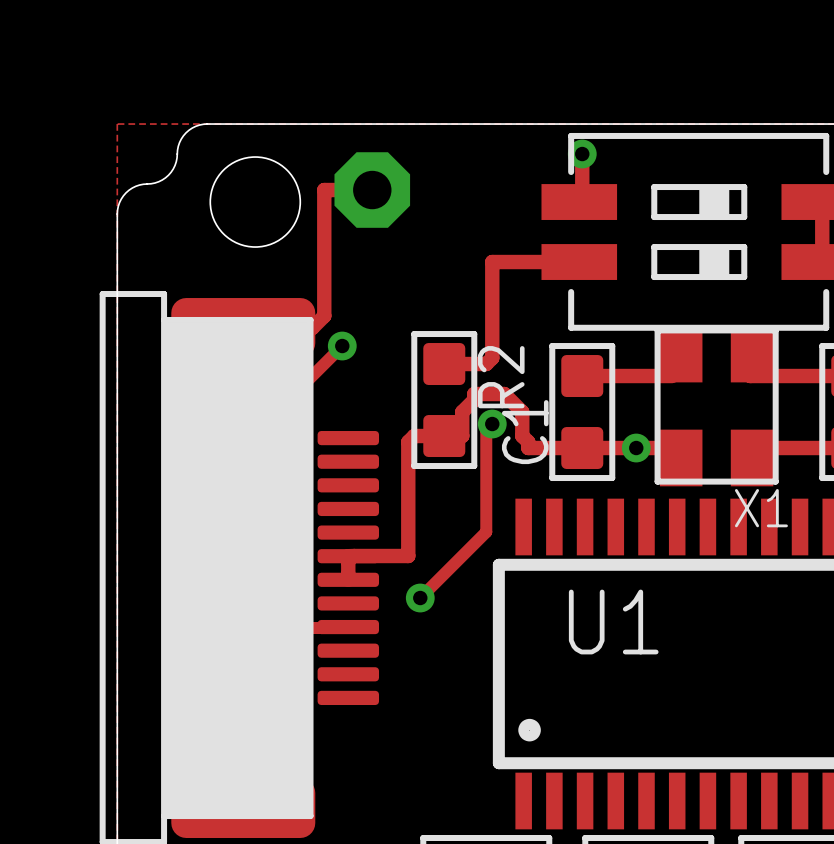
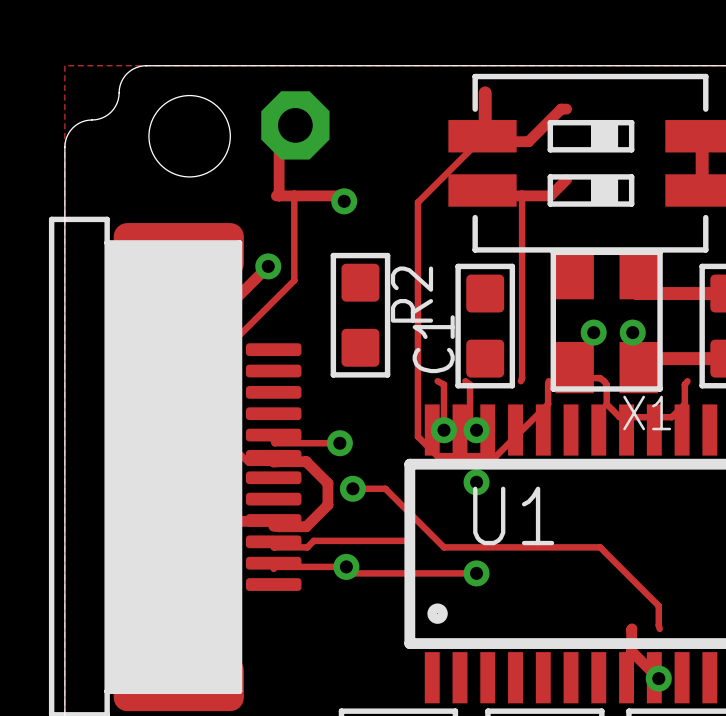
via: (582, 154) -> none
track: none -> (566, 109) (561, 109) (528, 141) (476, 143) (417, 202) (417, 436) (437, 456) (496, 456) (548, 404) (548, 381)
track: (372, 190) (324, 190) (324, 316) (312, 328) (243, 328) -> none
track: none -> (276, 141) (279, 141) (279, 195)
track: none -> (566, 179) (550, 195) (493, 195)
track: (579, 262) (492, 262) (492, 358) (486, 364) (444, 364) -> none
track: none -> (522, 195) (520, 381)
track: none -> (344, 201) (338, 195) (276, 195) (294, 195) (294, 280) (235, 339) (235, 449) (248, 462) (306, 461) (327, 483) (327, 505) (306, 526) (273, 526)
via: none -> (344, 201)
track: (582, 376) (672, 376) -> none
via: none -> (593, 332)
via: none -> (632, 332)
track: (492, 424) (486, 430) (486, 532) (420, 598) -> none
via: (492, 424) -> none
via: (636, 448) -> none
track: (681, 457) (678, 454) (678, 448) (528, 448) (528, 442) (522, 436) (522, 412) (504, 394) (474, 394) (474, 400) (462, 412) (462, 436) (414, 436) (408, 442) (408, 556) (348, 556) (348, 579) -> none
track: none -> (437, 381) (444, 384) (444, 430)
track: none -> (465, 381) (470, 384) (470, 423) (476, 430)
track: none -> (576, 381) (580, 378) (600, 378) (604, 381) (606, 384) (606, 404) (619, 417) (671, 417) (684, 404) (684, 384) (687, 381)
via: none -> (444, 430)
via: none -> (476, 430)
track: none -> (273, 440) (274, 443) (339, 443)
via: none -> (339, 443)
via: none -> (476, 482)
track: none -> (352, 488) (385, 488) (444, 547) (600, 547) (658, 605) (659, 628)
via position: (420, 598) -> (352, 488)
track: none -> (404, 540) (313, 540) (307, 547) (273, 547)
via: none -> (346, 566)
track: none -> (273, 568) (274, 566) (346, 566) (352, 573) (476, 573)
via: none -> (476, 573)
track: none -> (631, 628) (631, 651) (658, 678)
via: none -> (658, 678)

